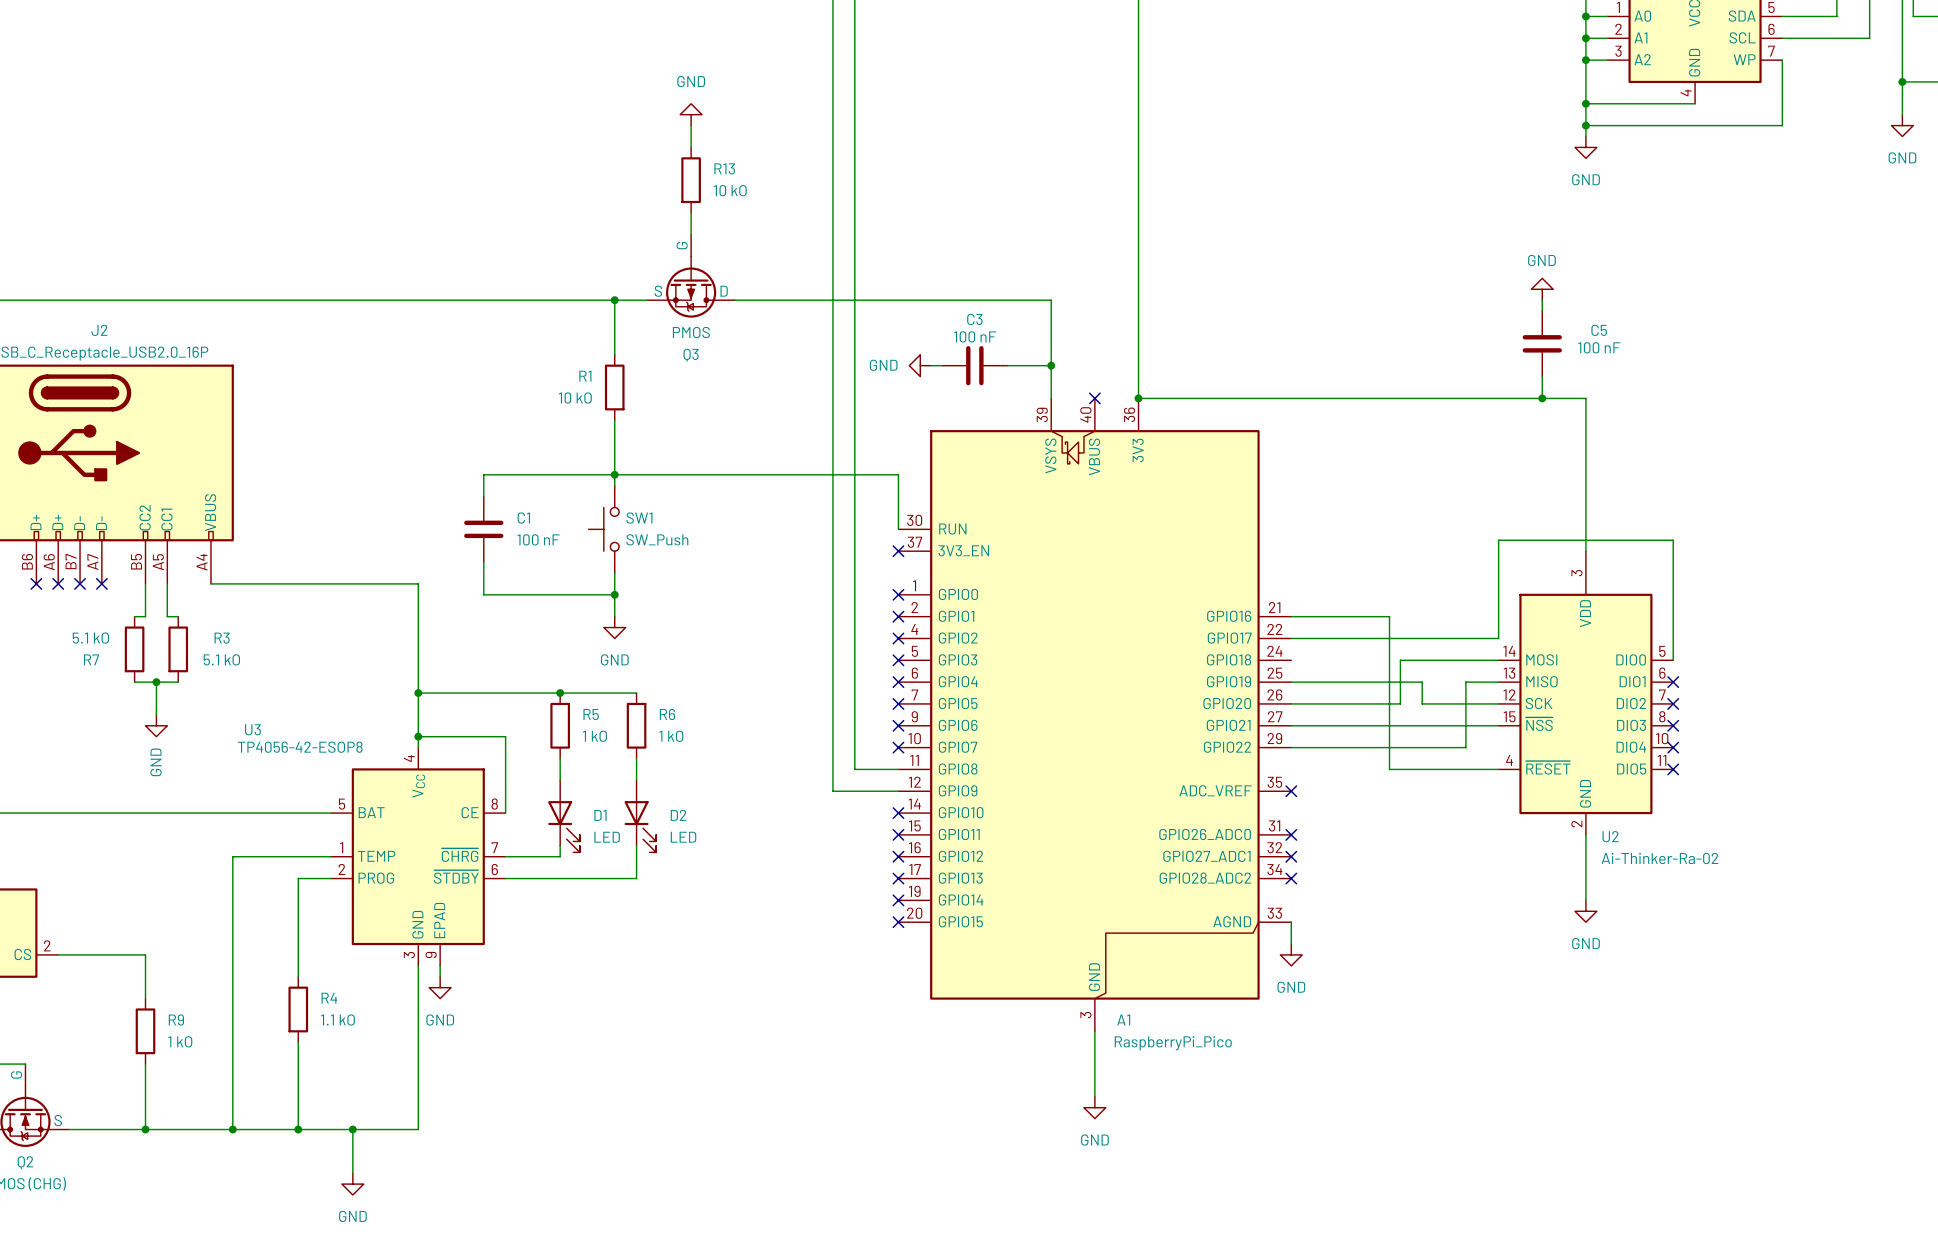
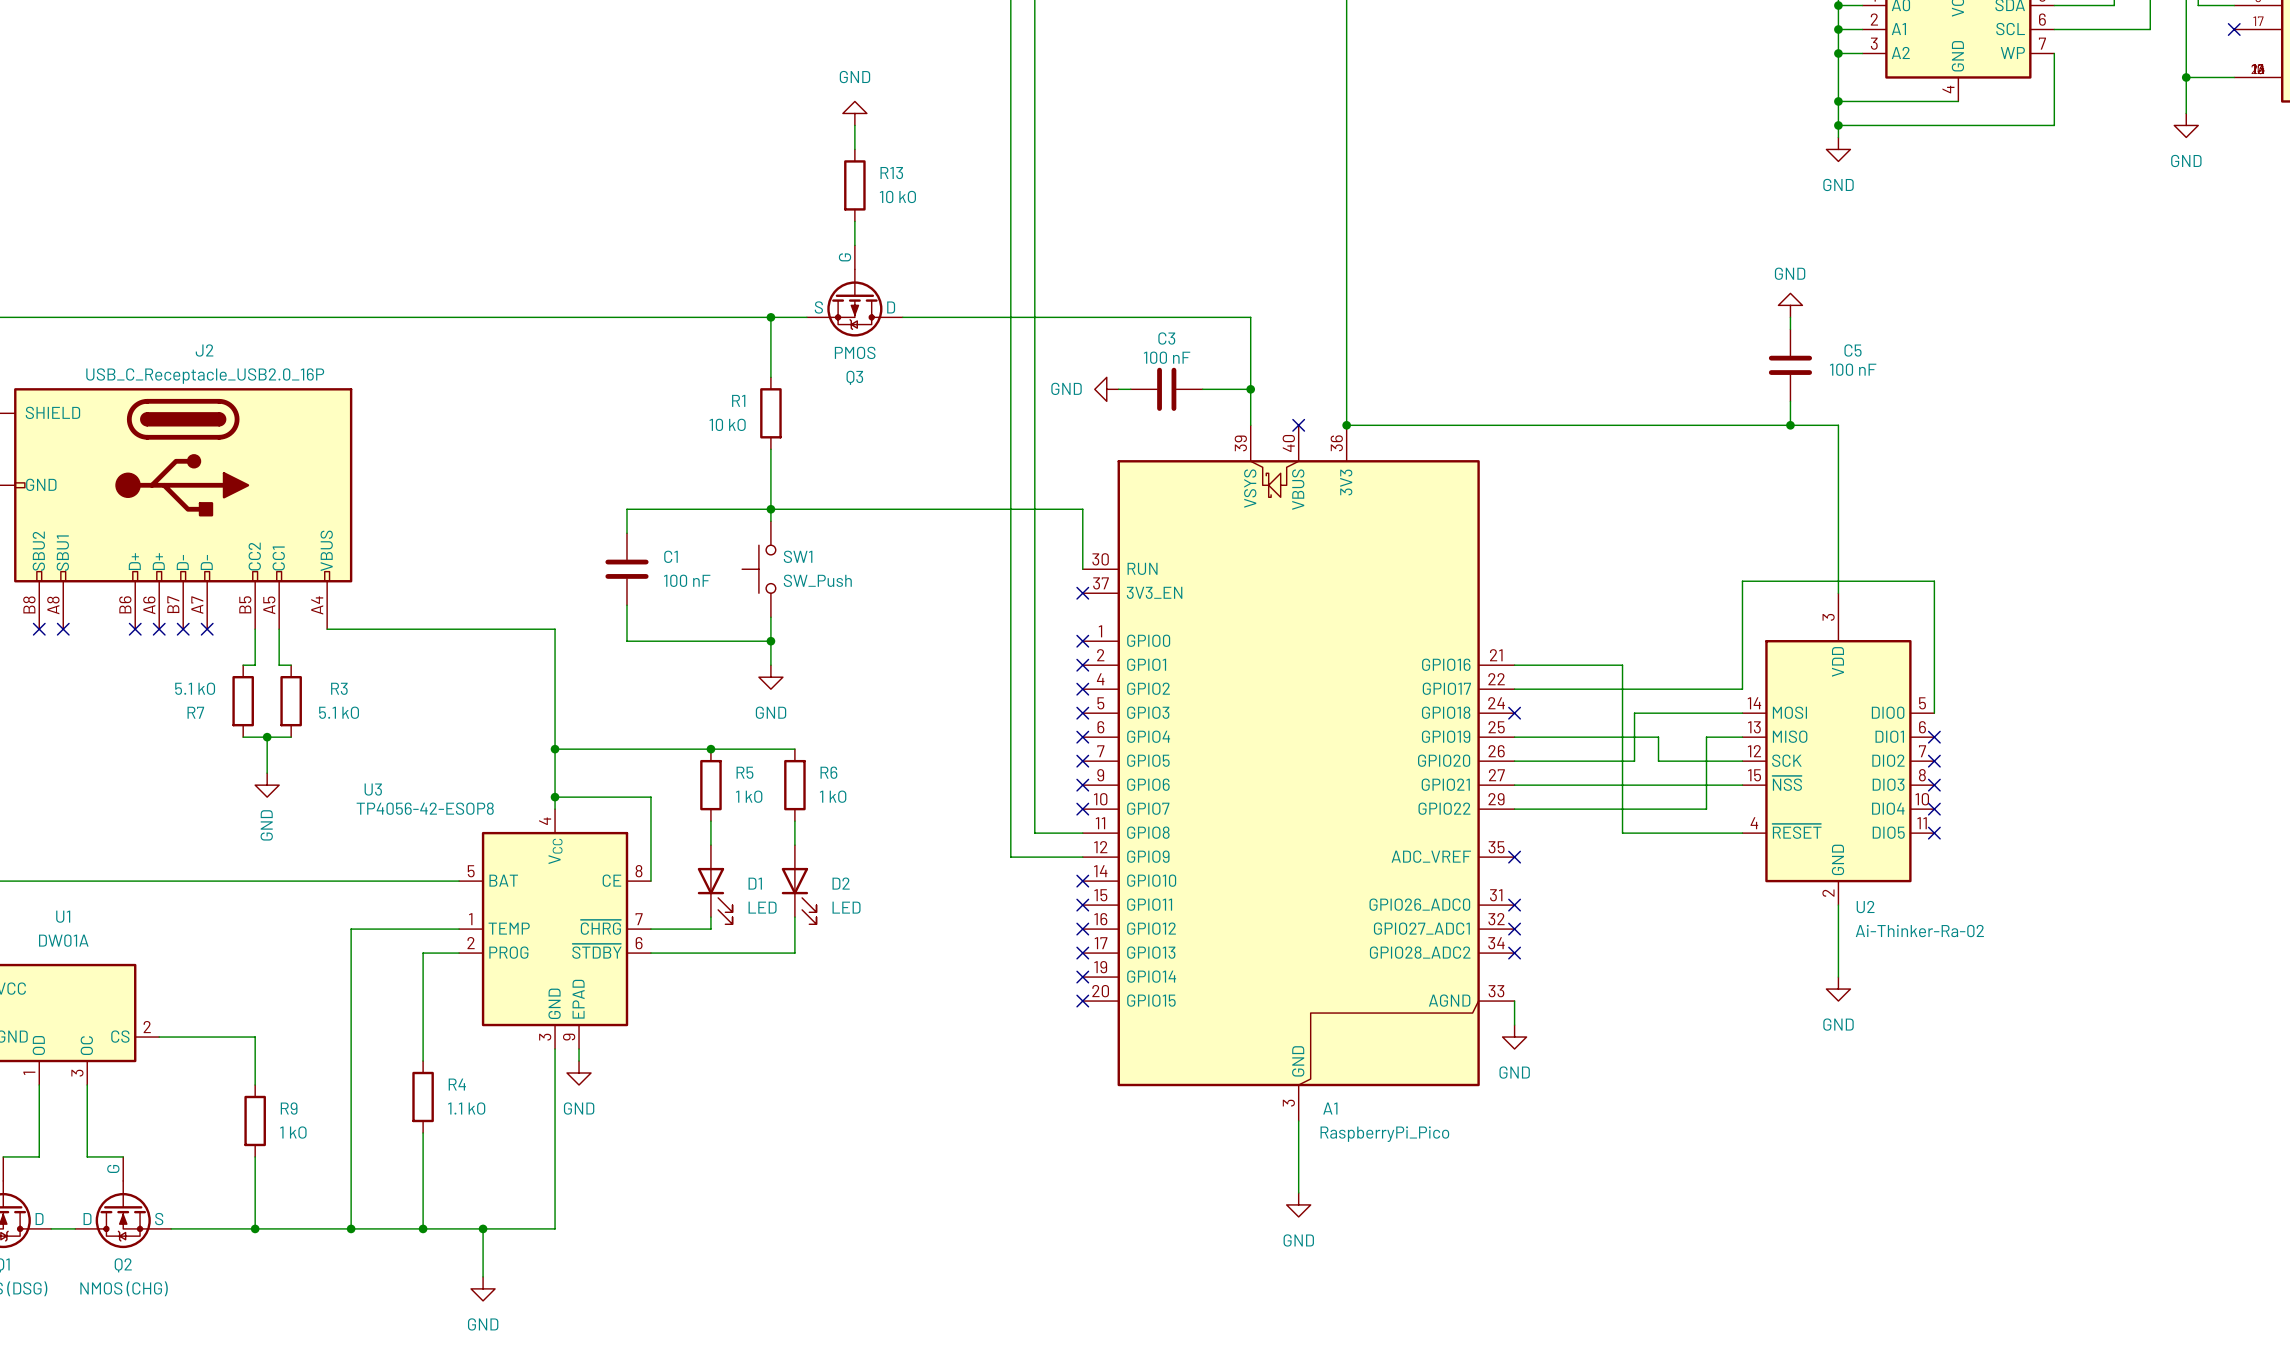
no-connect mark: none -> (1514, 713)

